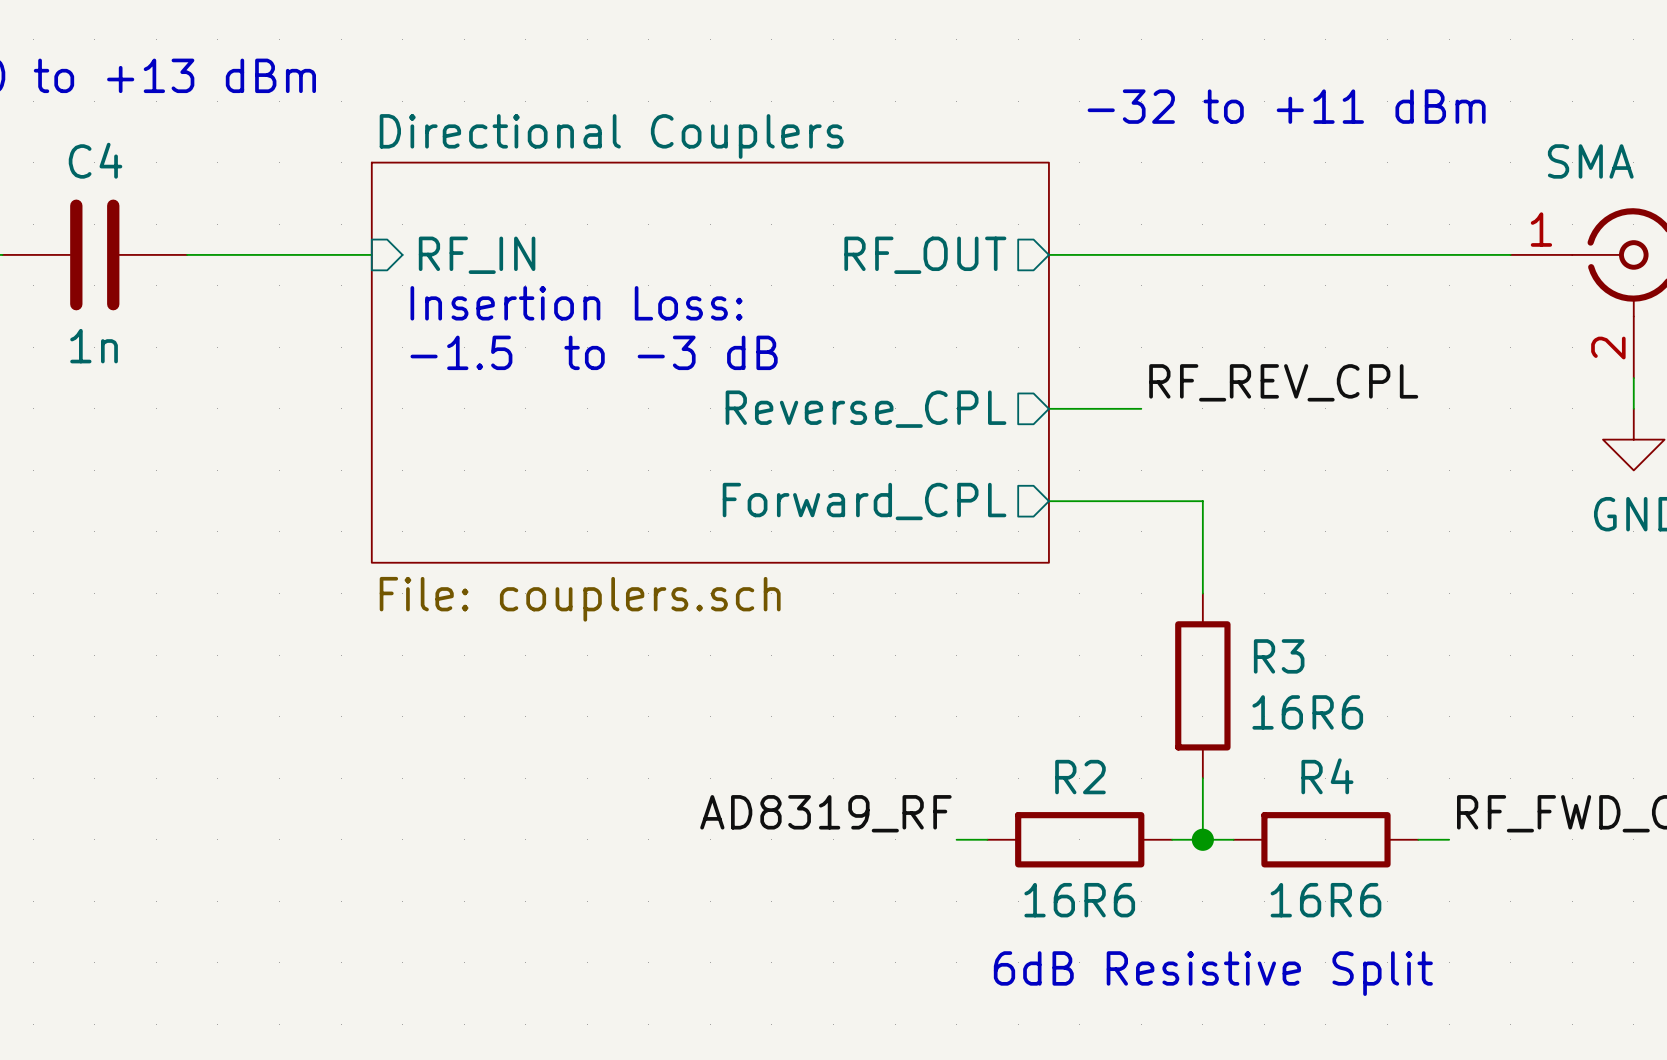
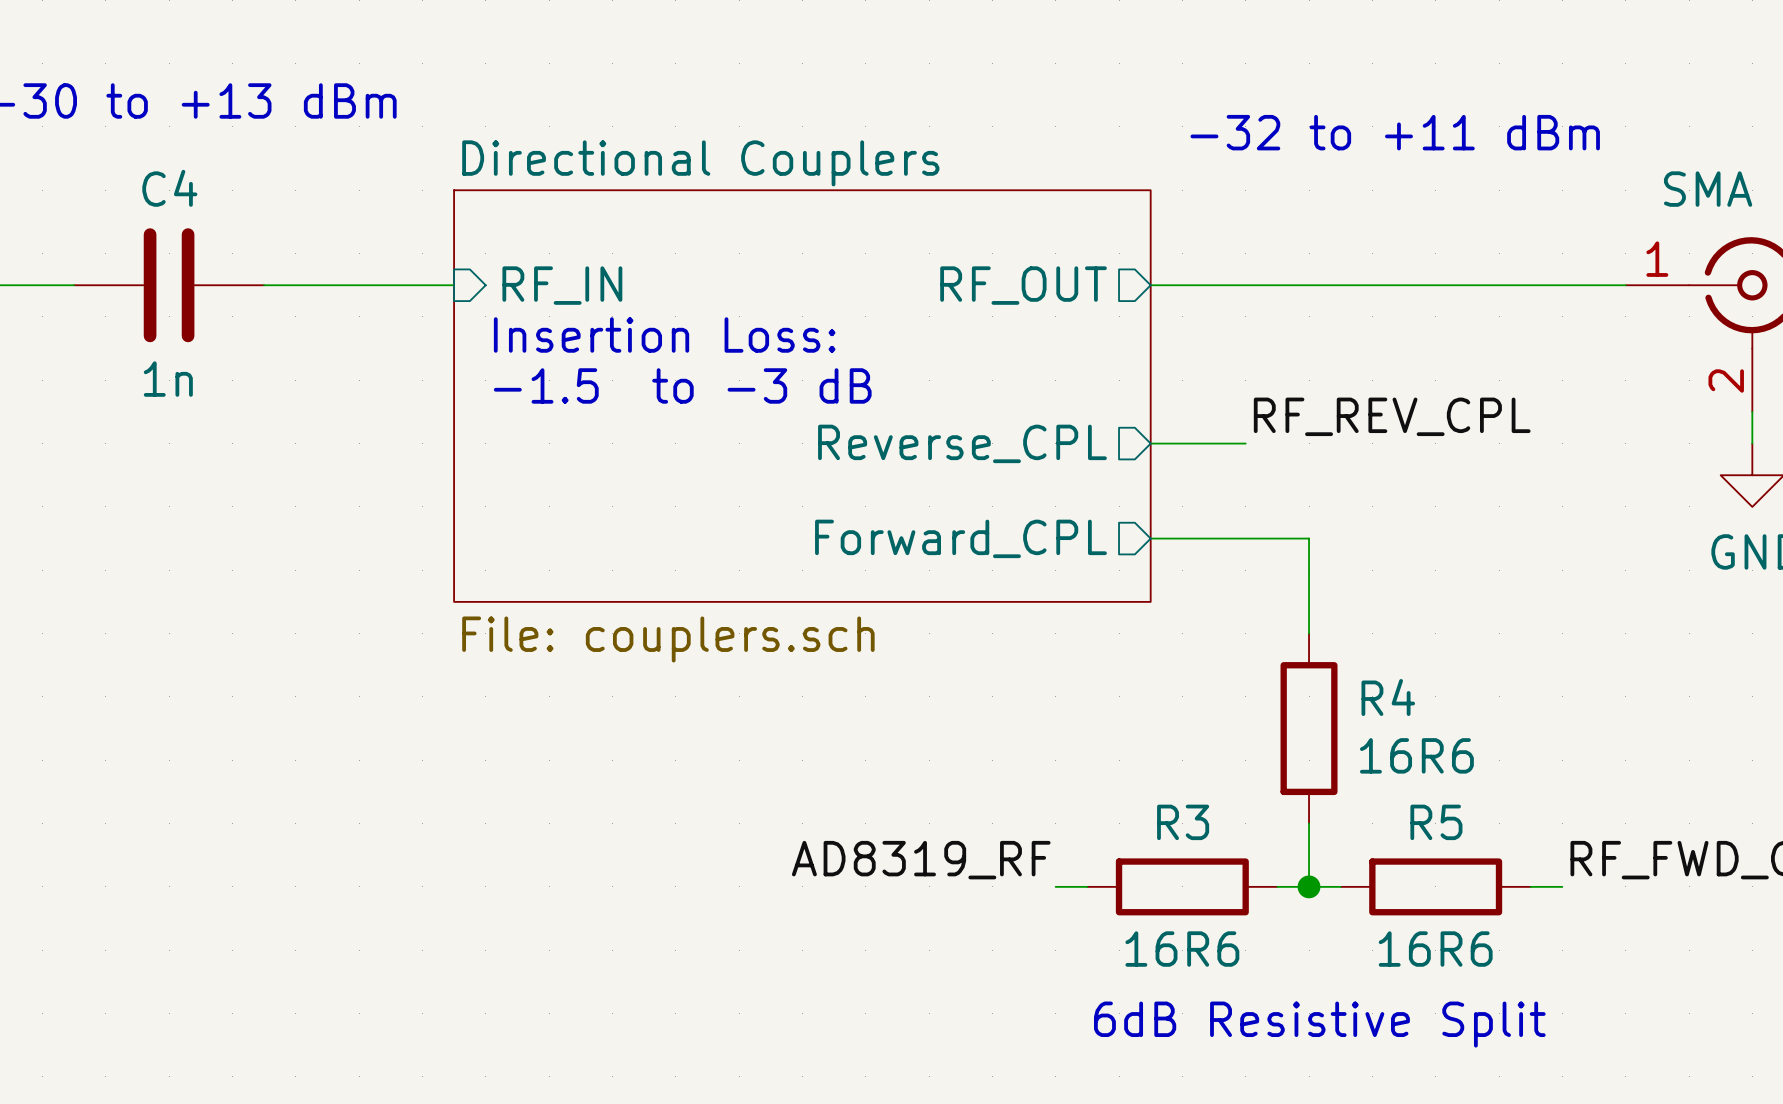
R3 name: R3 (1279, 656) -> R4 (1388, 697)
R4 name: R4 (1327, 776) -> R5 (1436, 822)
R2 name: R2 (1080, 777) -> R3 (1183, 822)

